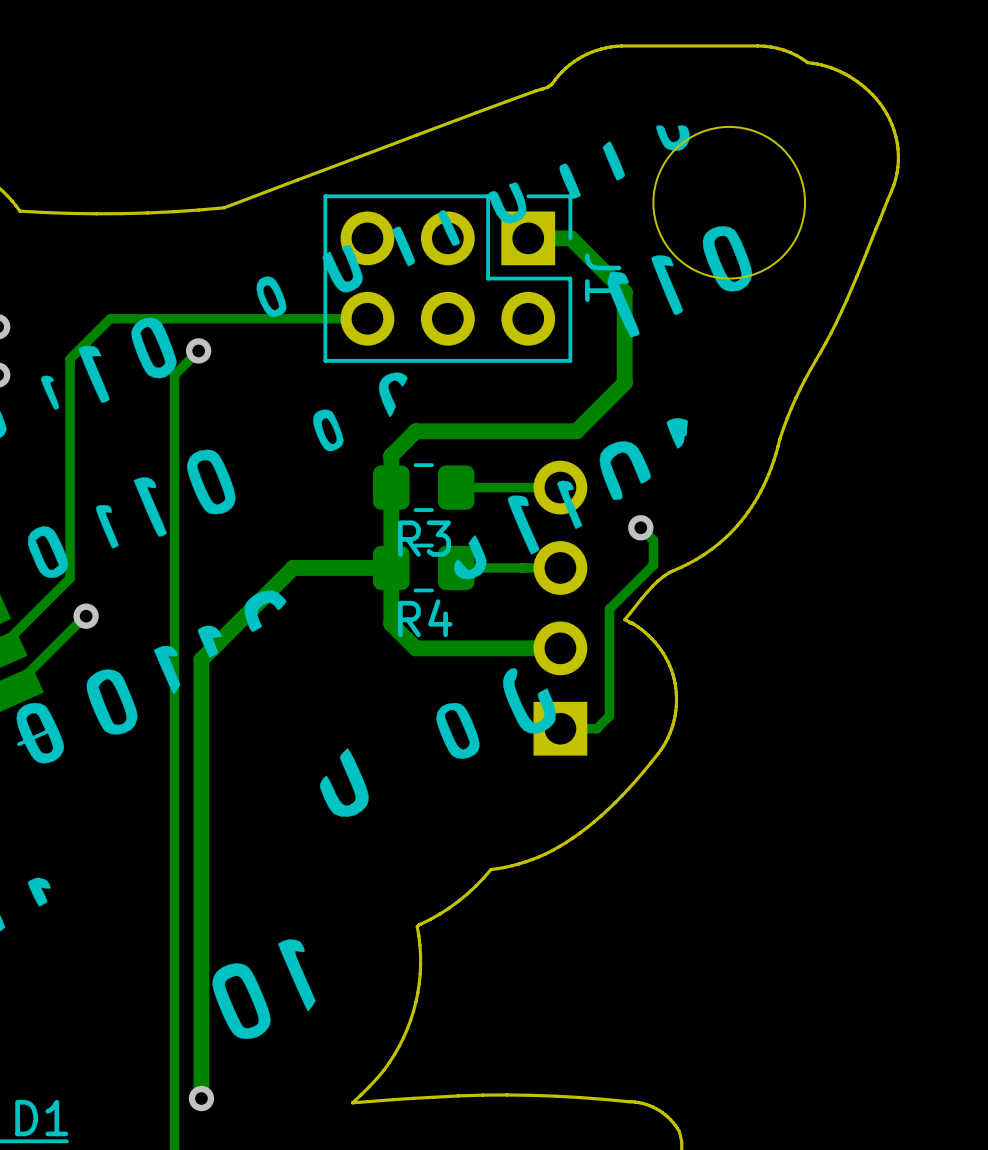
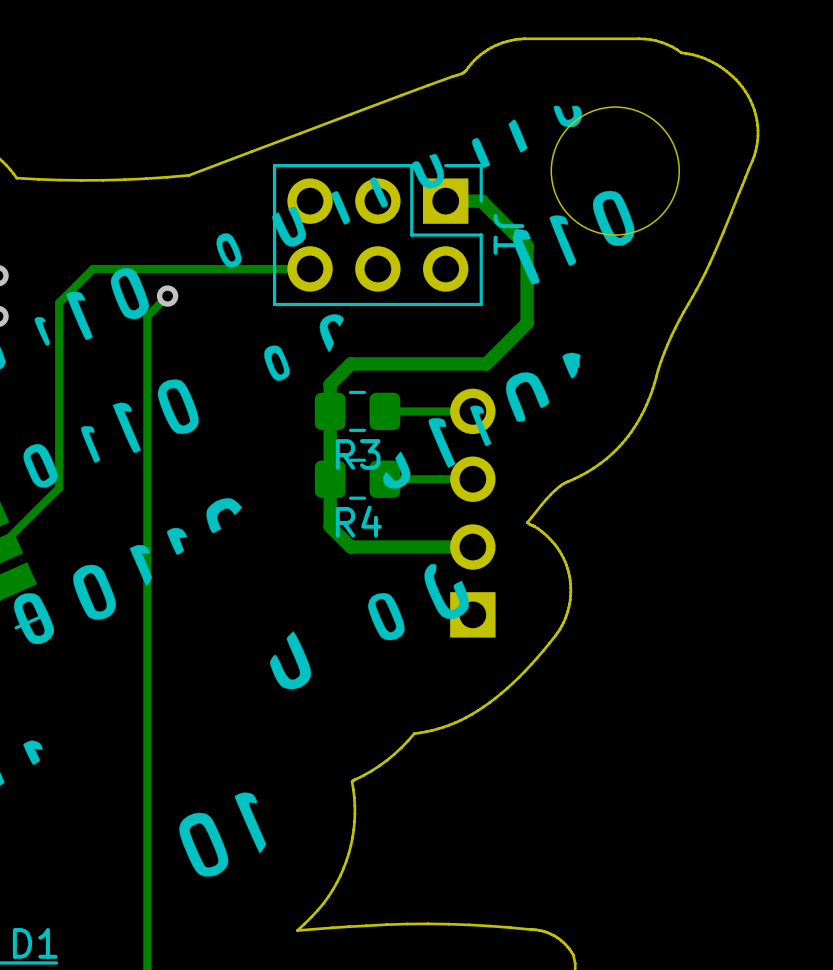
track: (640, 527) (653, 540) (653, 565) (609, 609) (609, 716) (596, 728) (560, 728) -> none
via: (640, 527) -> none
track: (391, 567) (293, 567) (201, 659) (201, 1098) -> none
track: (86, 616) (9, 692) -> none
via: (86, 616) -> none
via: (201, 1098) -> none

